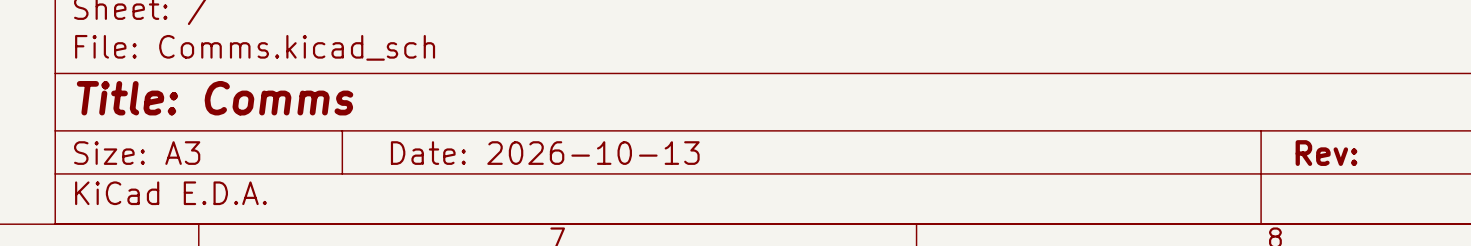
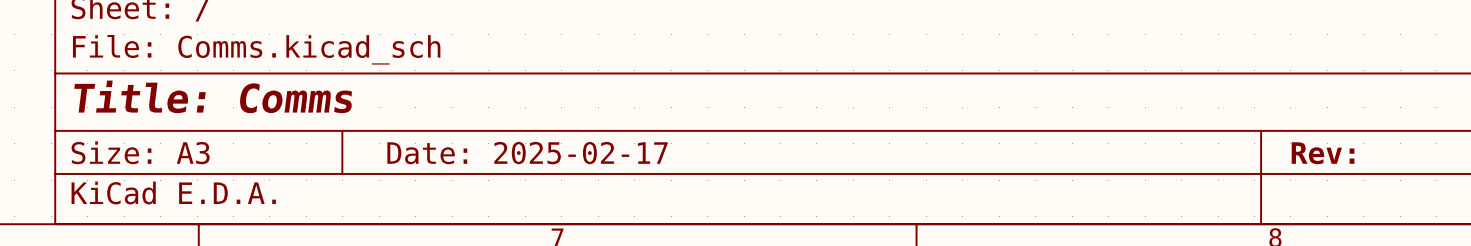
title block: Date: 2026-10-13 (545, 153) -> Date: 2025-02-17 (527, 153)

